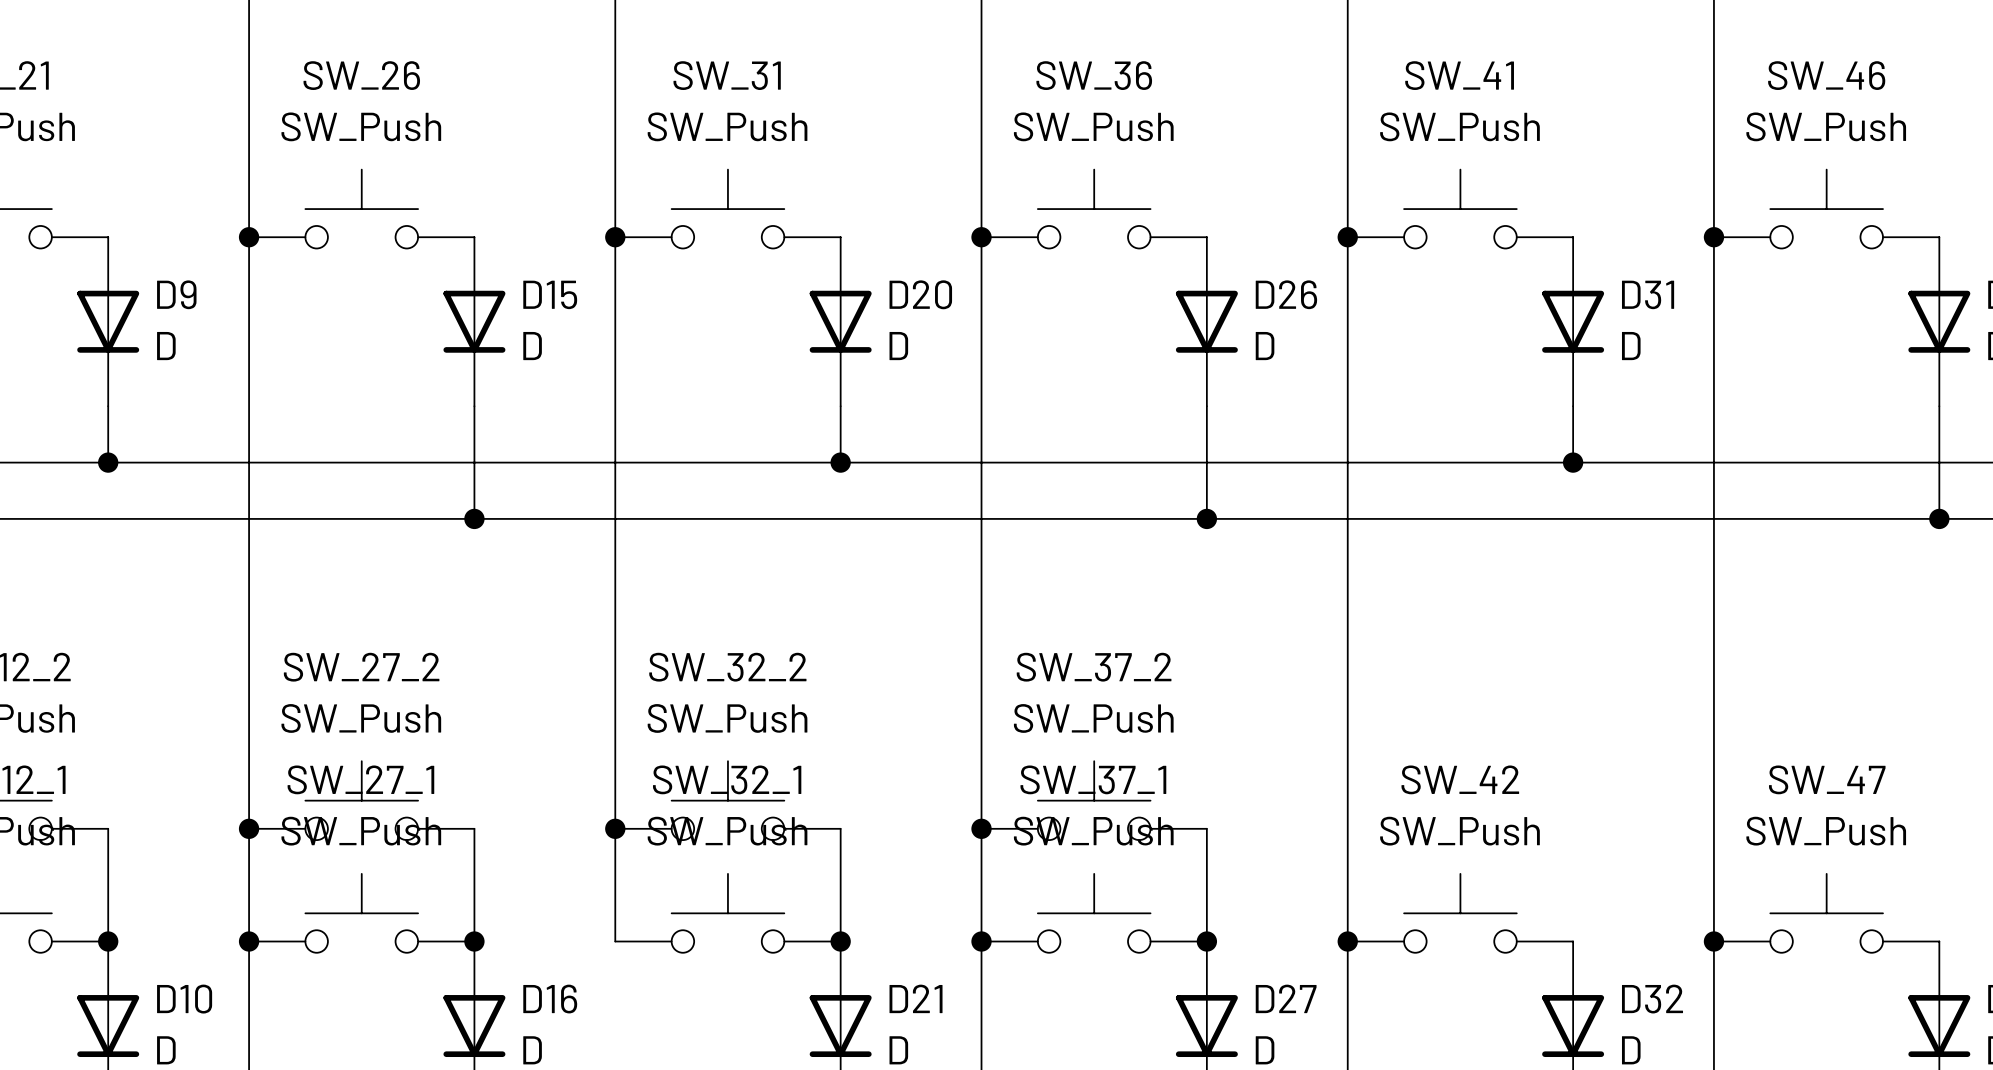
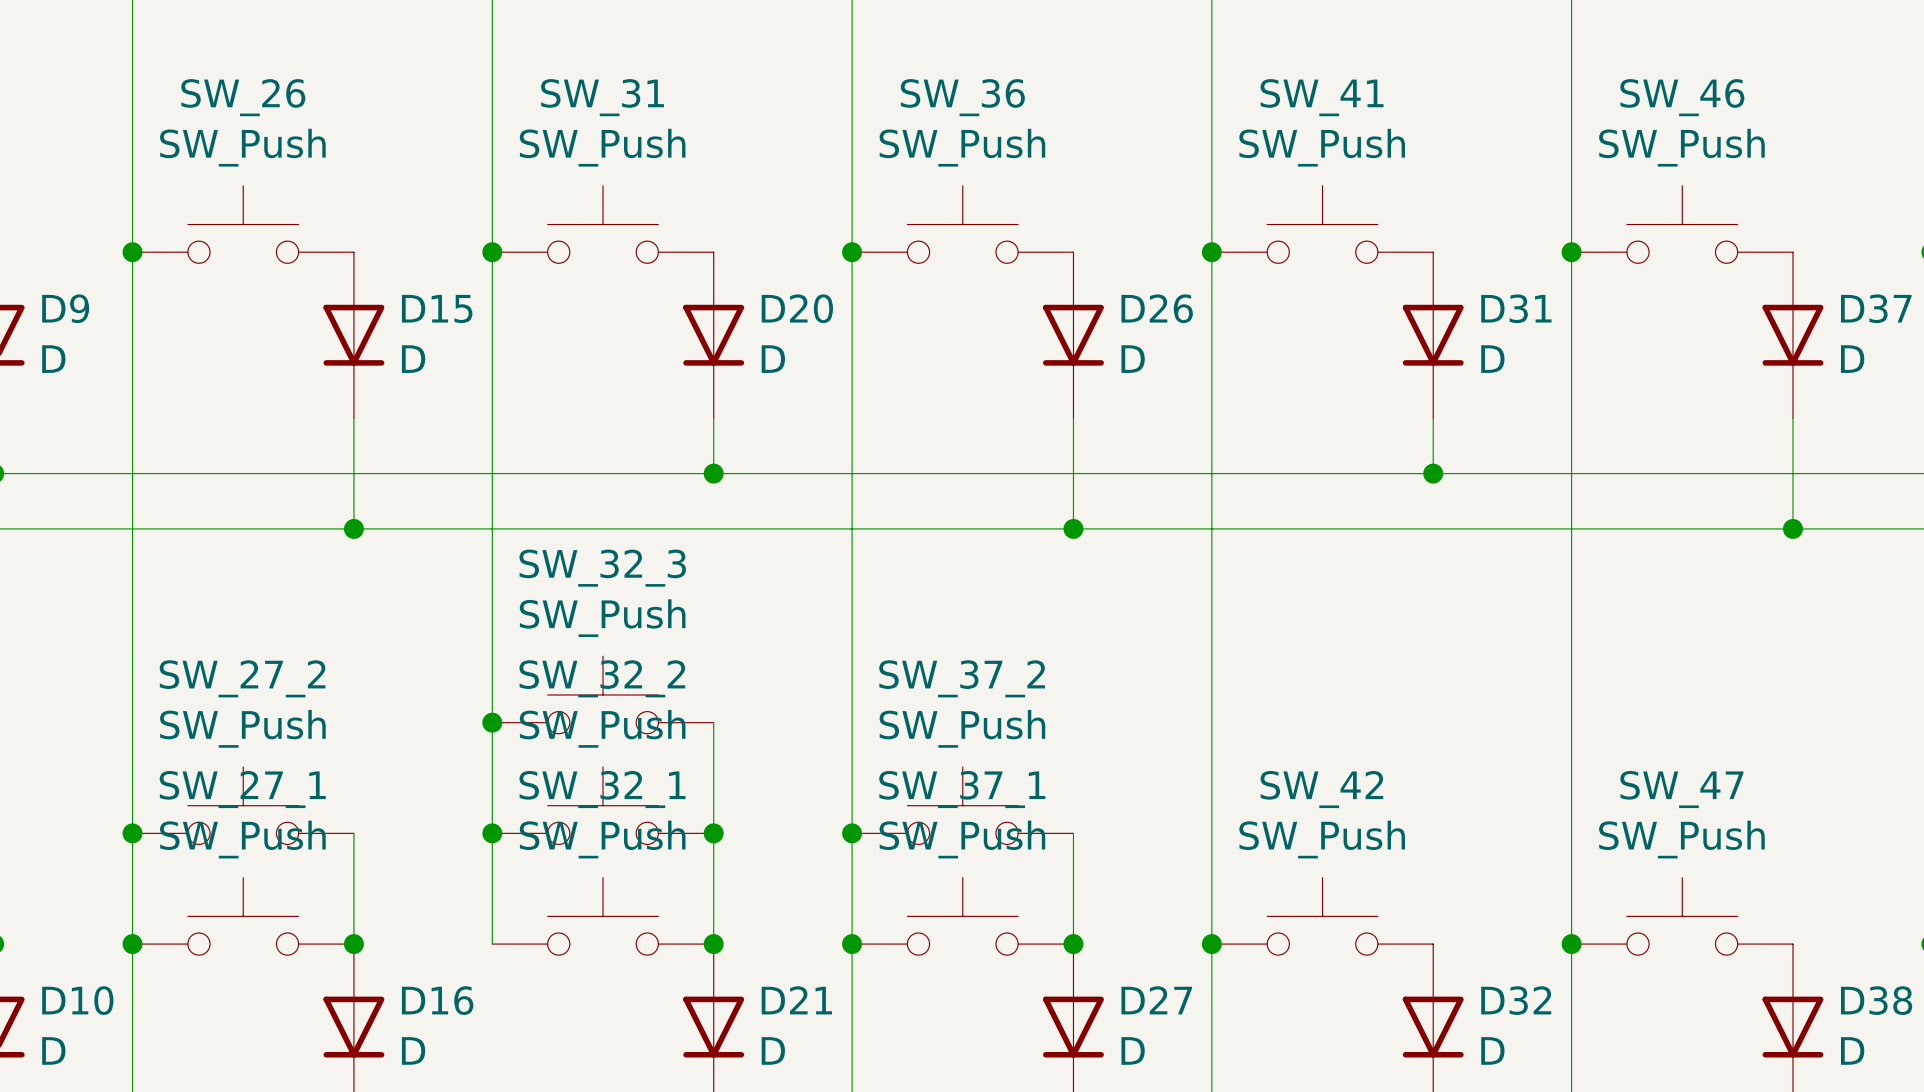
SW_32_3: none -> SW_Push (603, 694)
junction: none -> (492, 722)
wire: none -> (713, 722) (713, 833)
junction: none -> (713, 833)

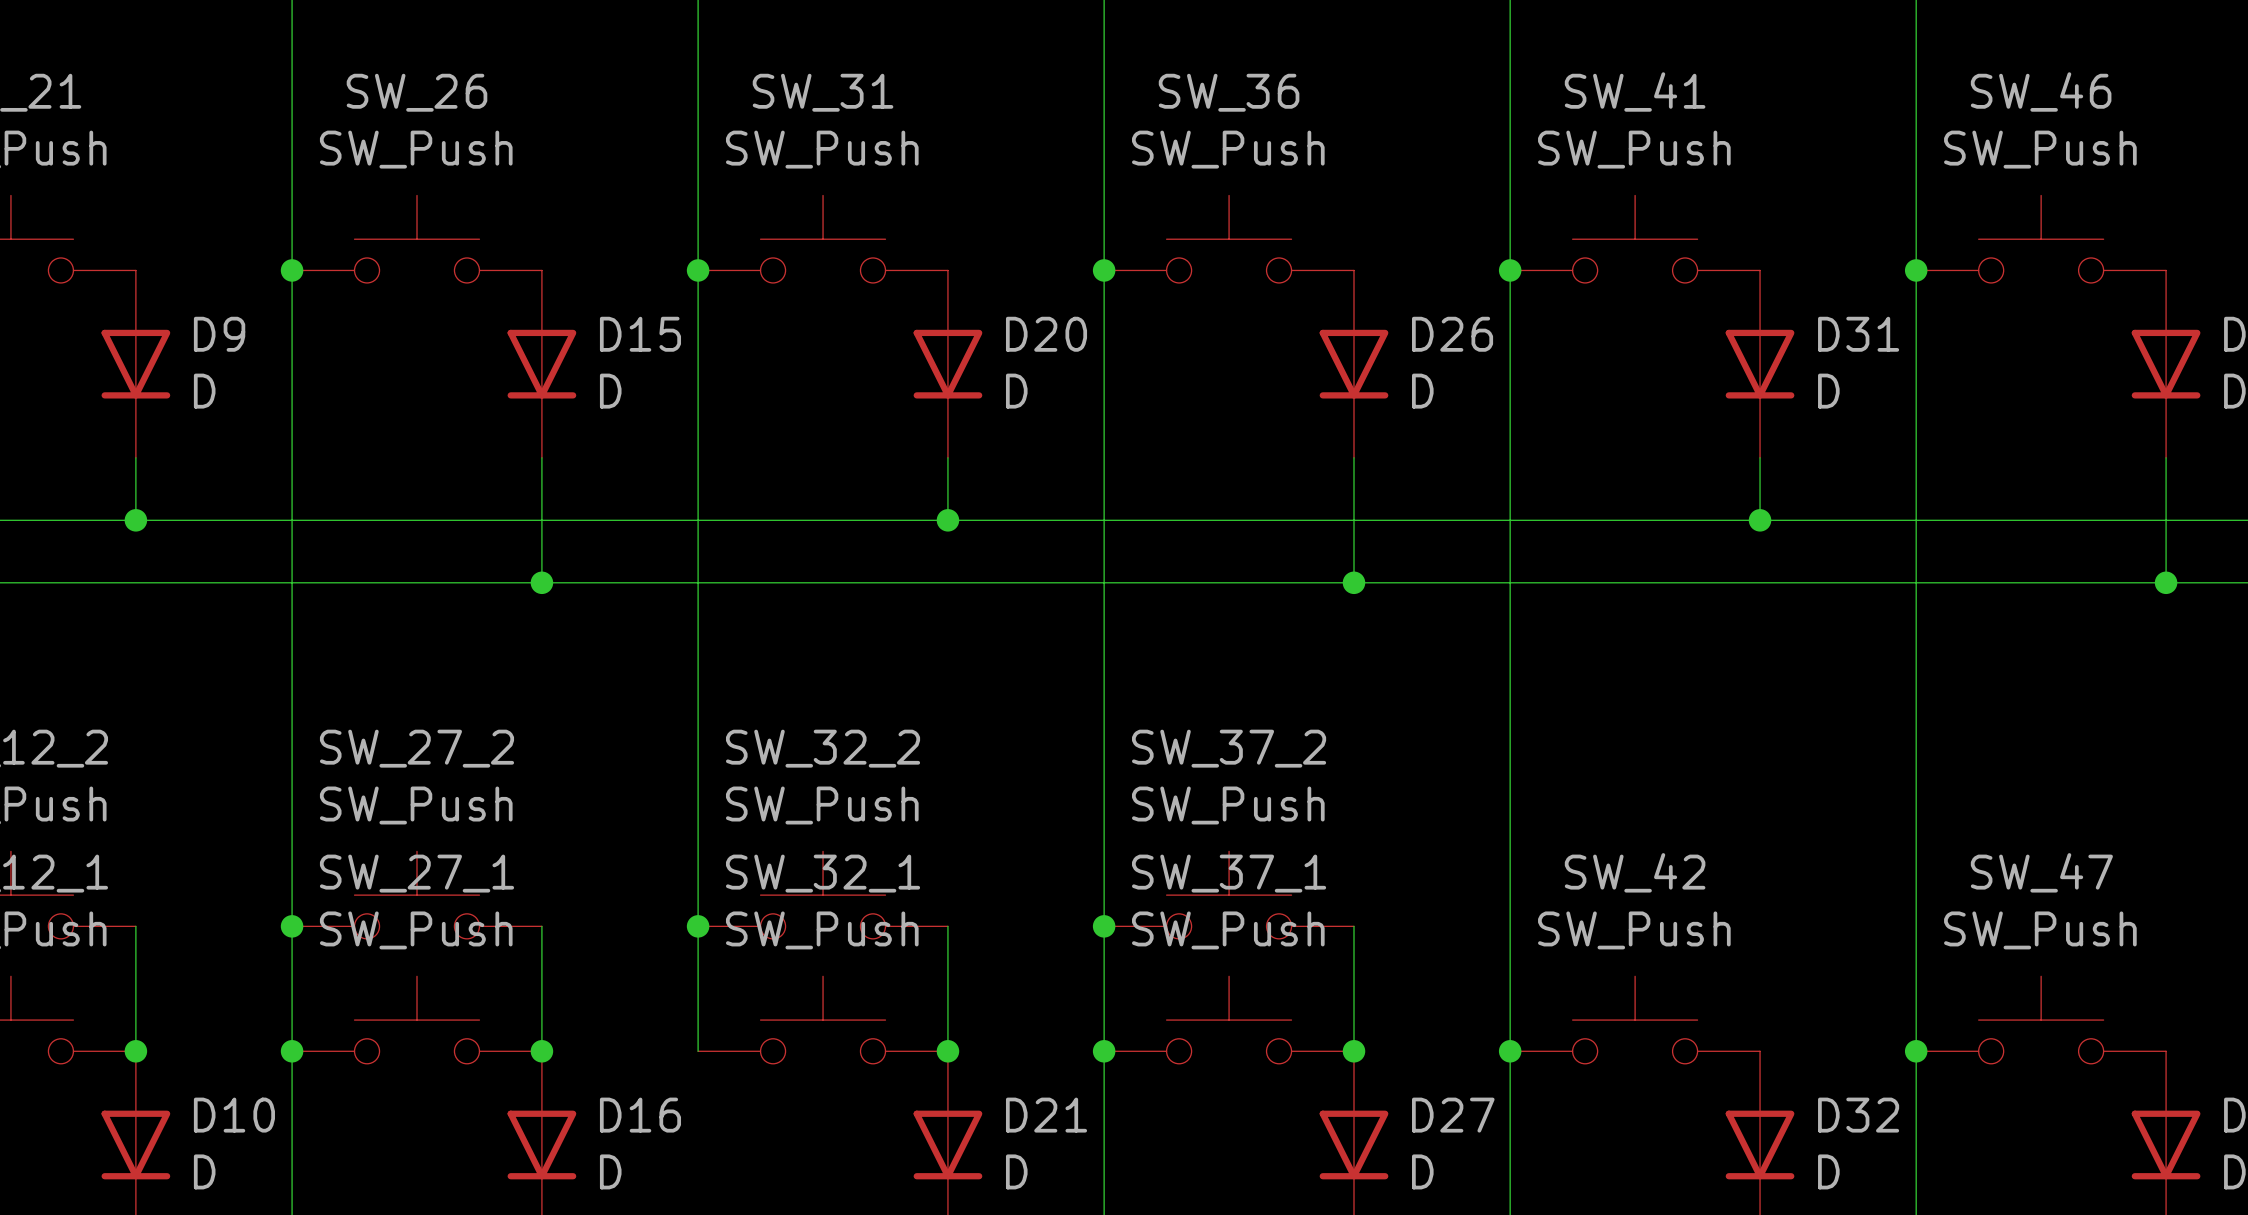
SW_32_3: SW_Push (603, 694) -> none
junction: (492, 722) -> none
wire: (713, 722) (713, 833) -> none
junction: (713, 833) -> none

